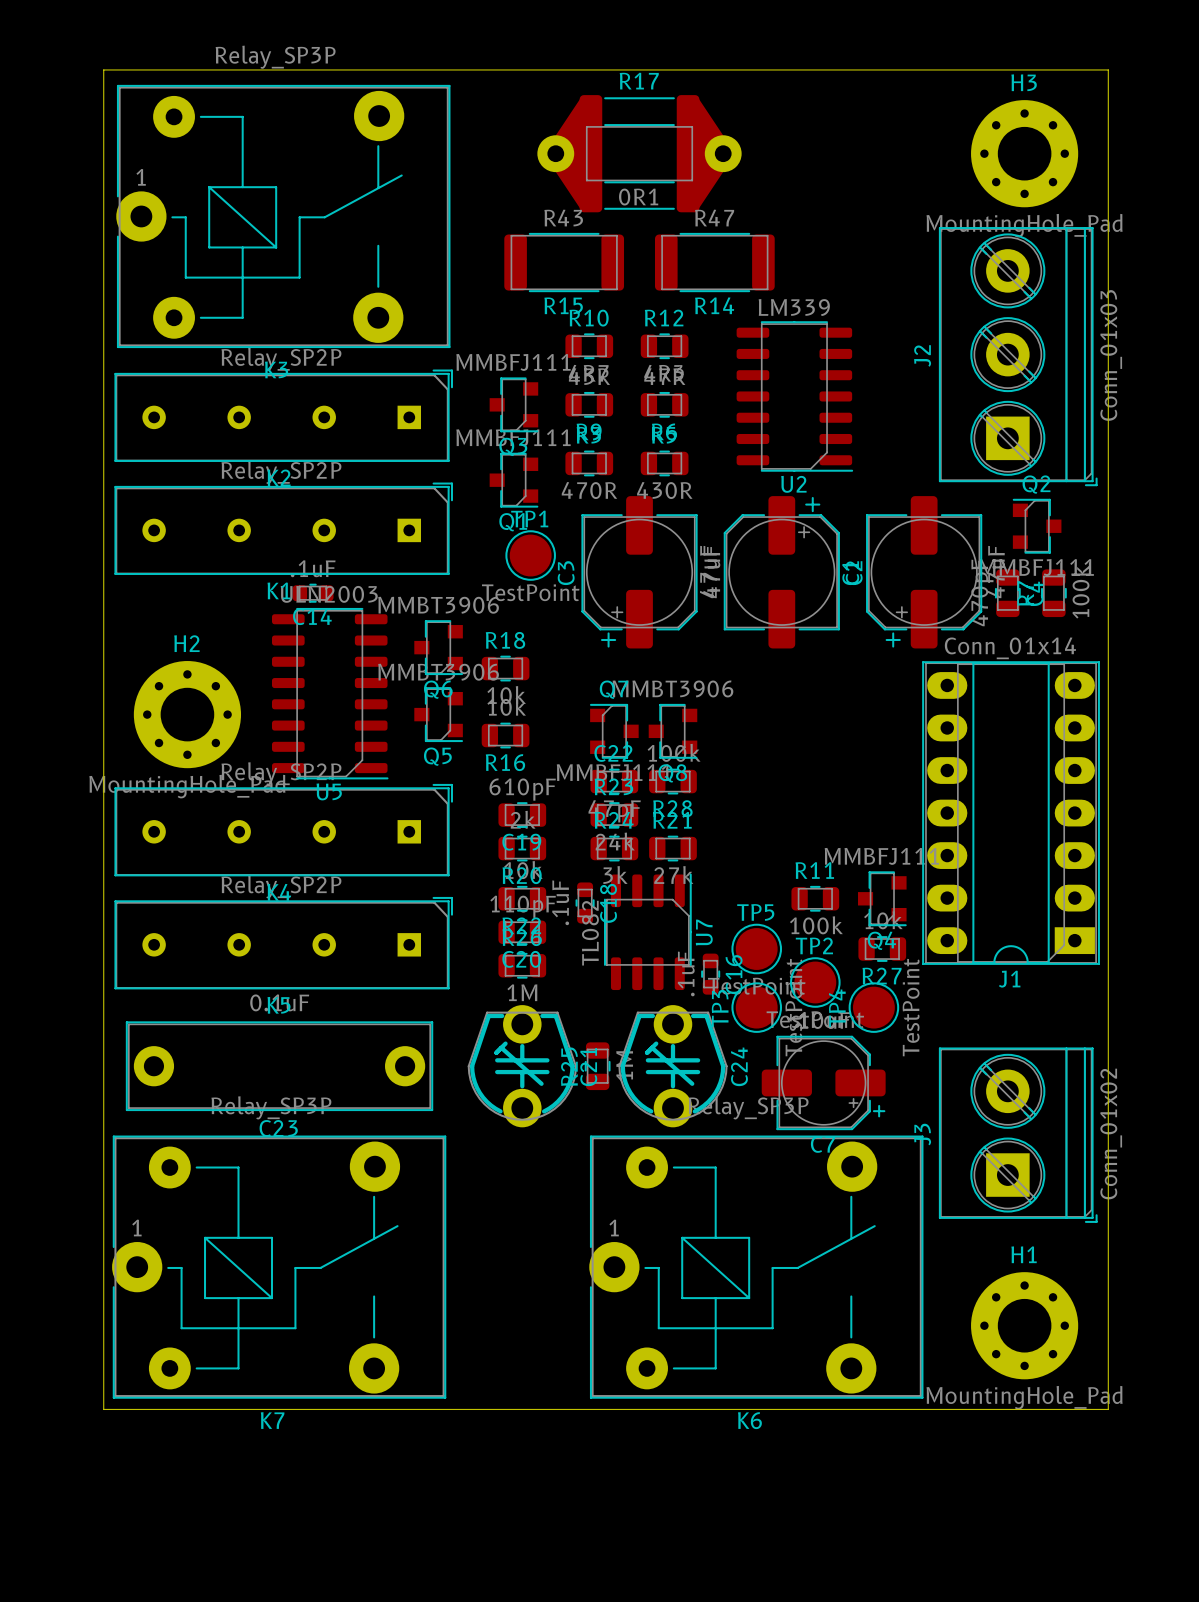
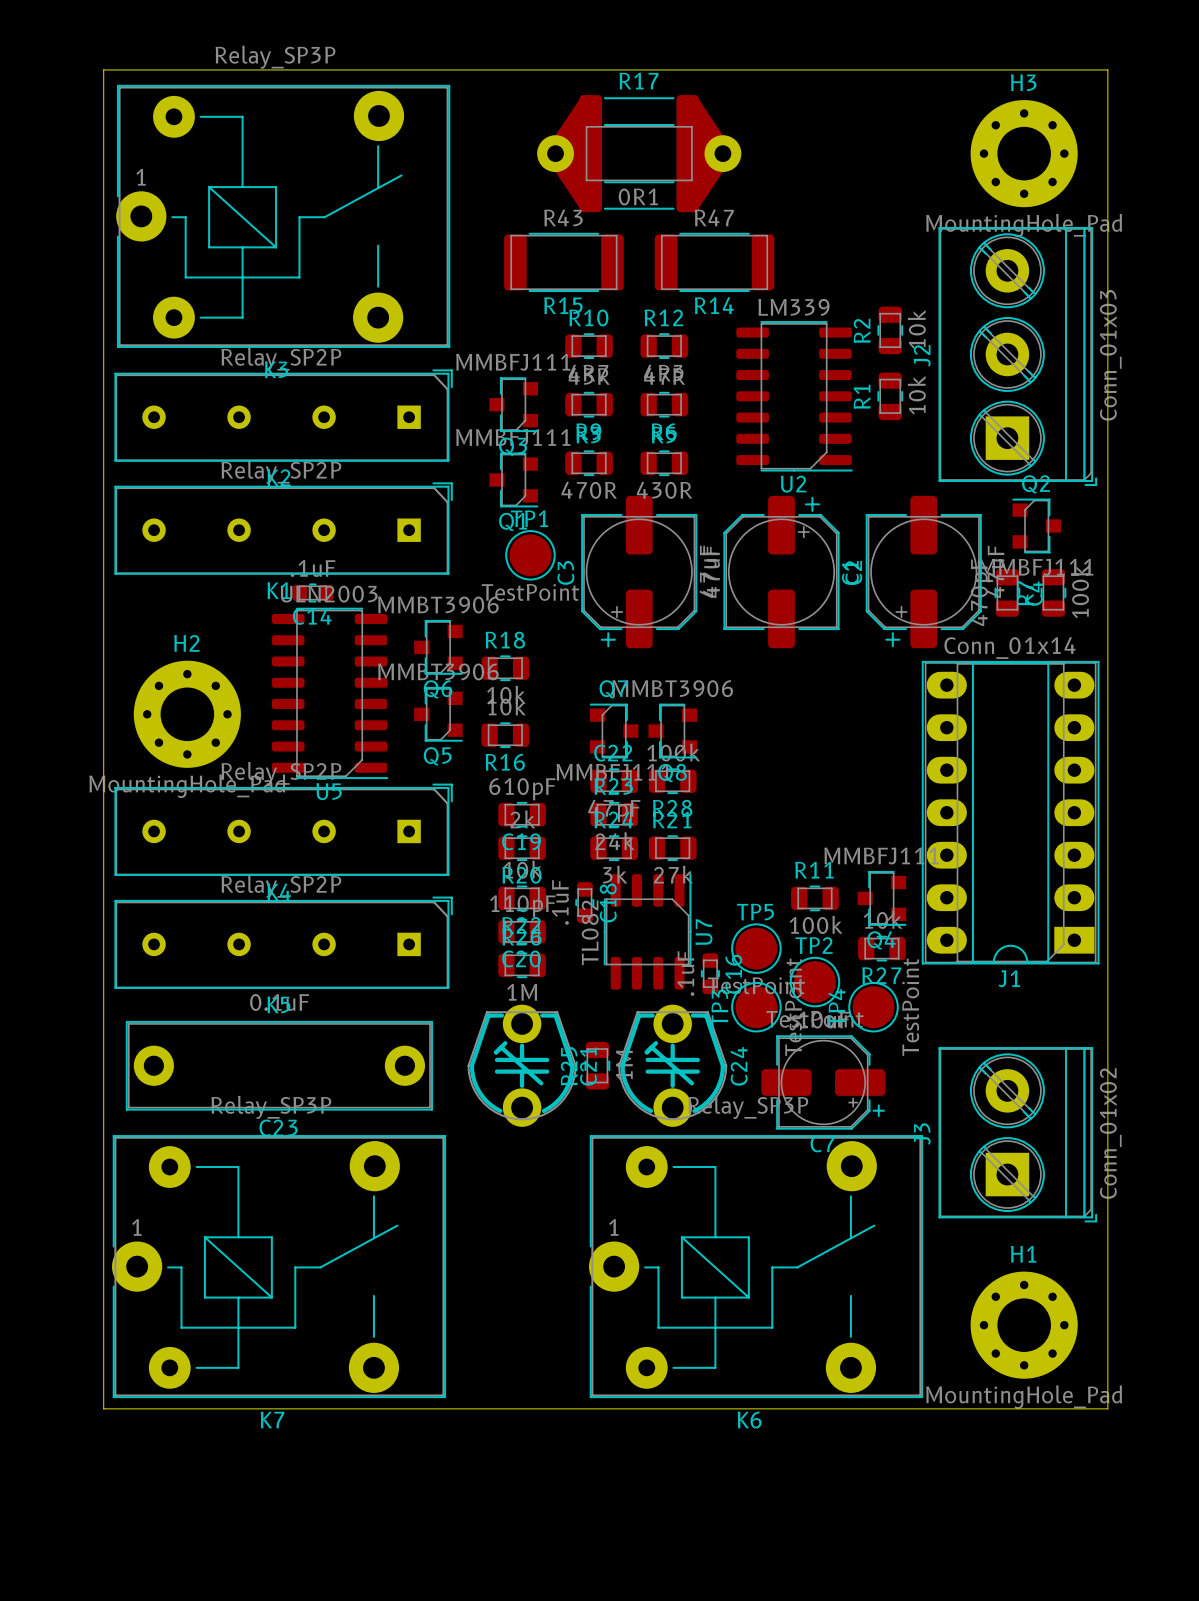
R2: none -> 10k (890, 330)
R1: none -> 10k (890, 396)

